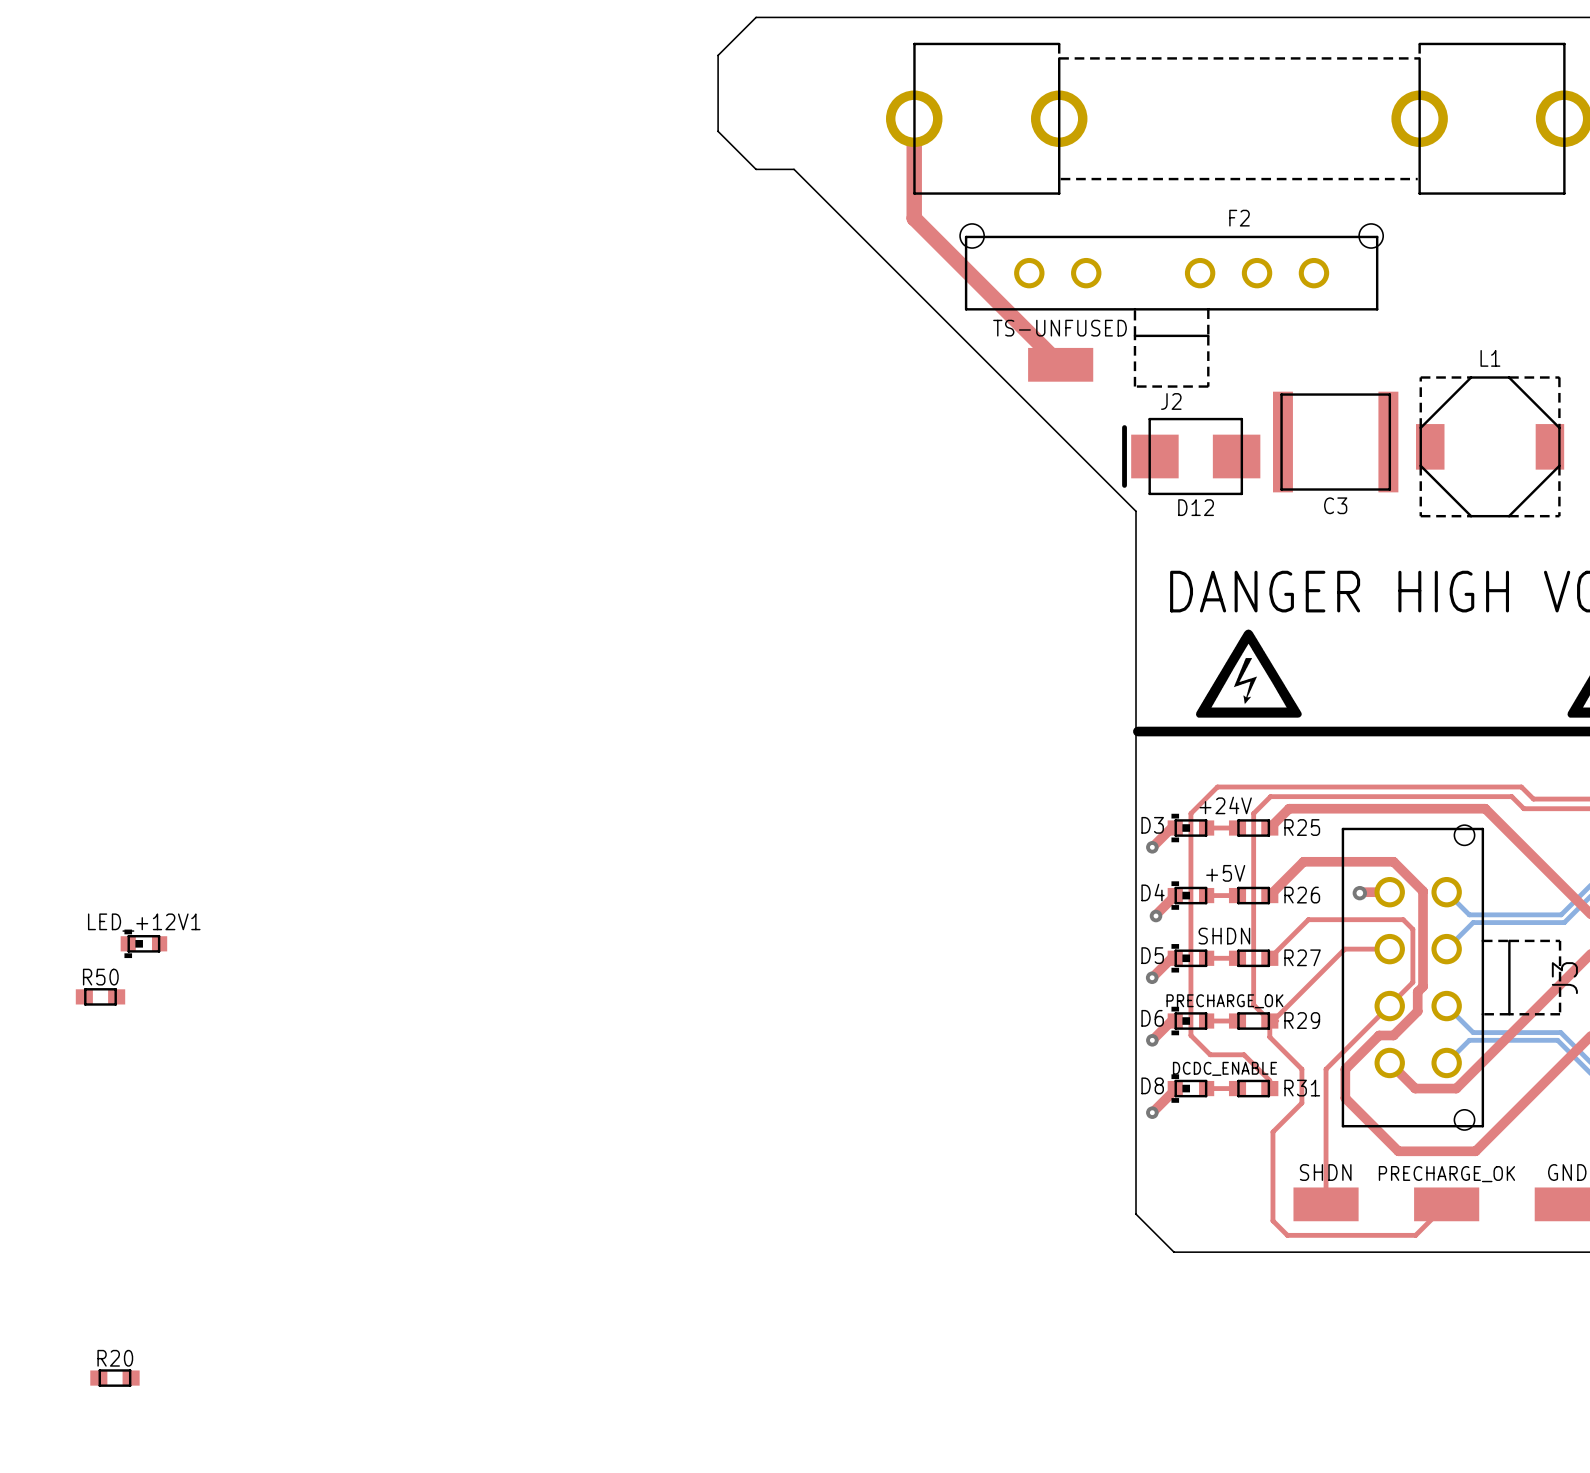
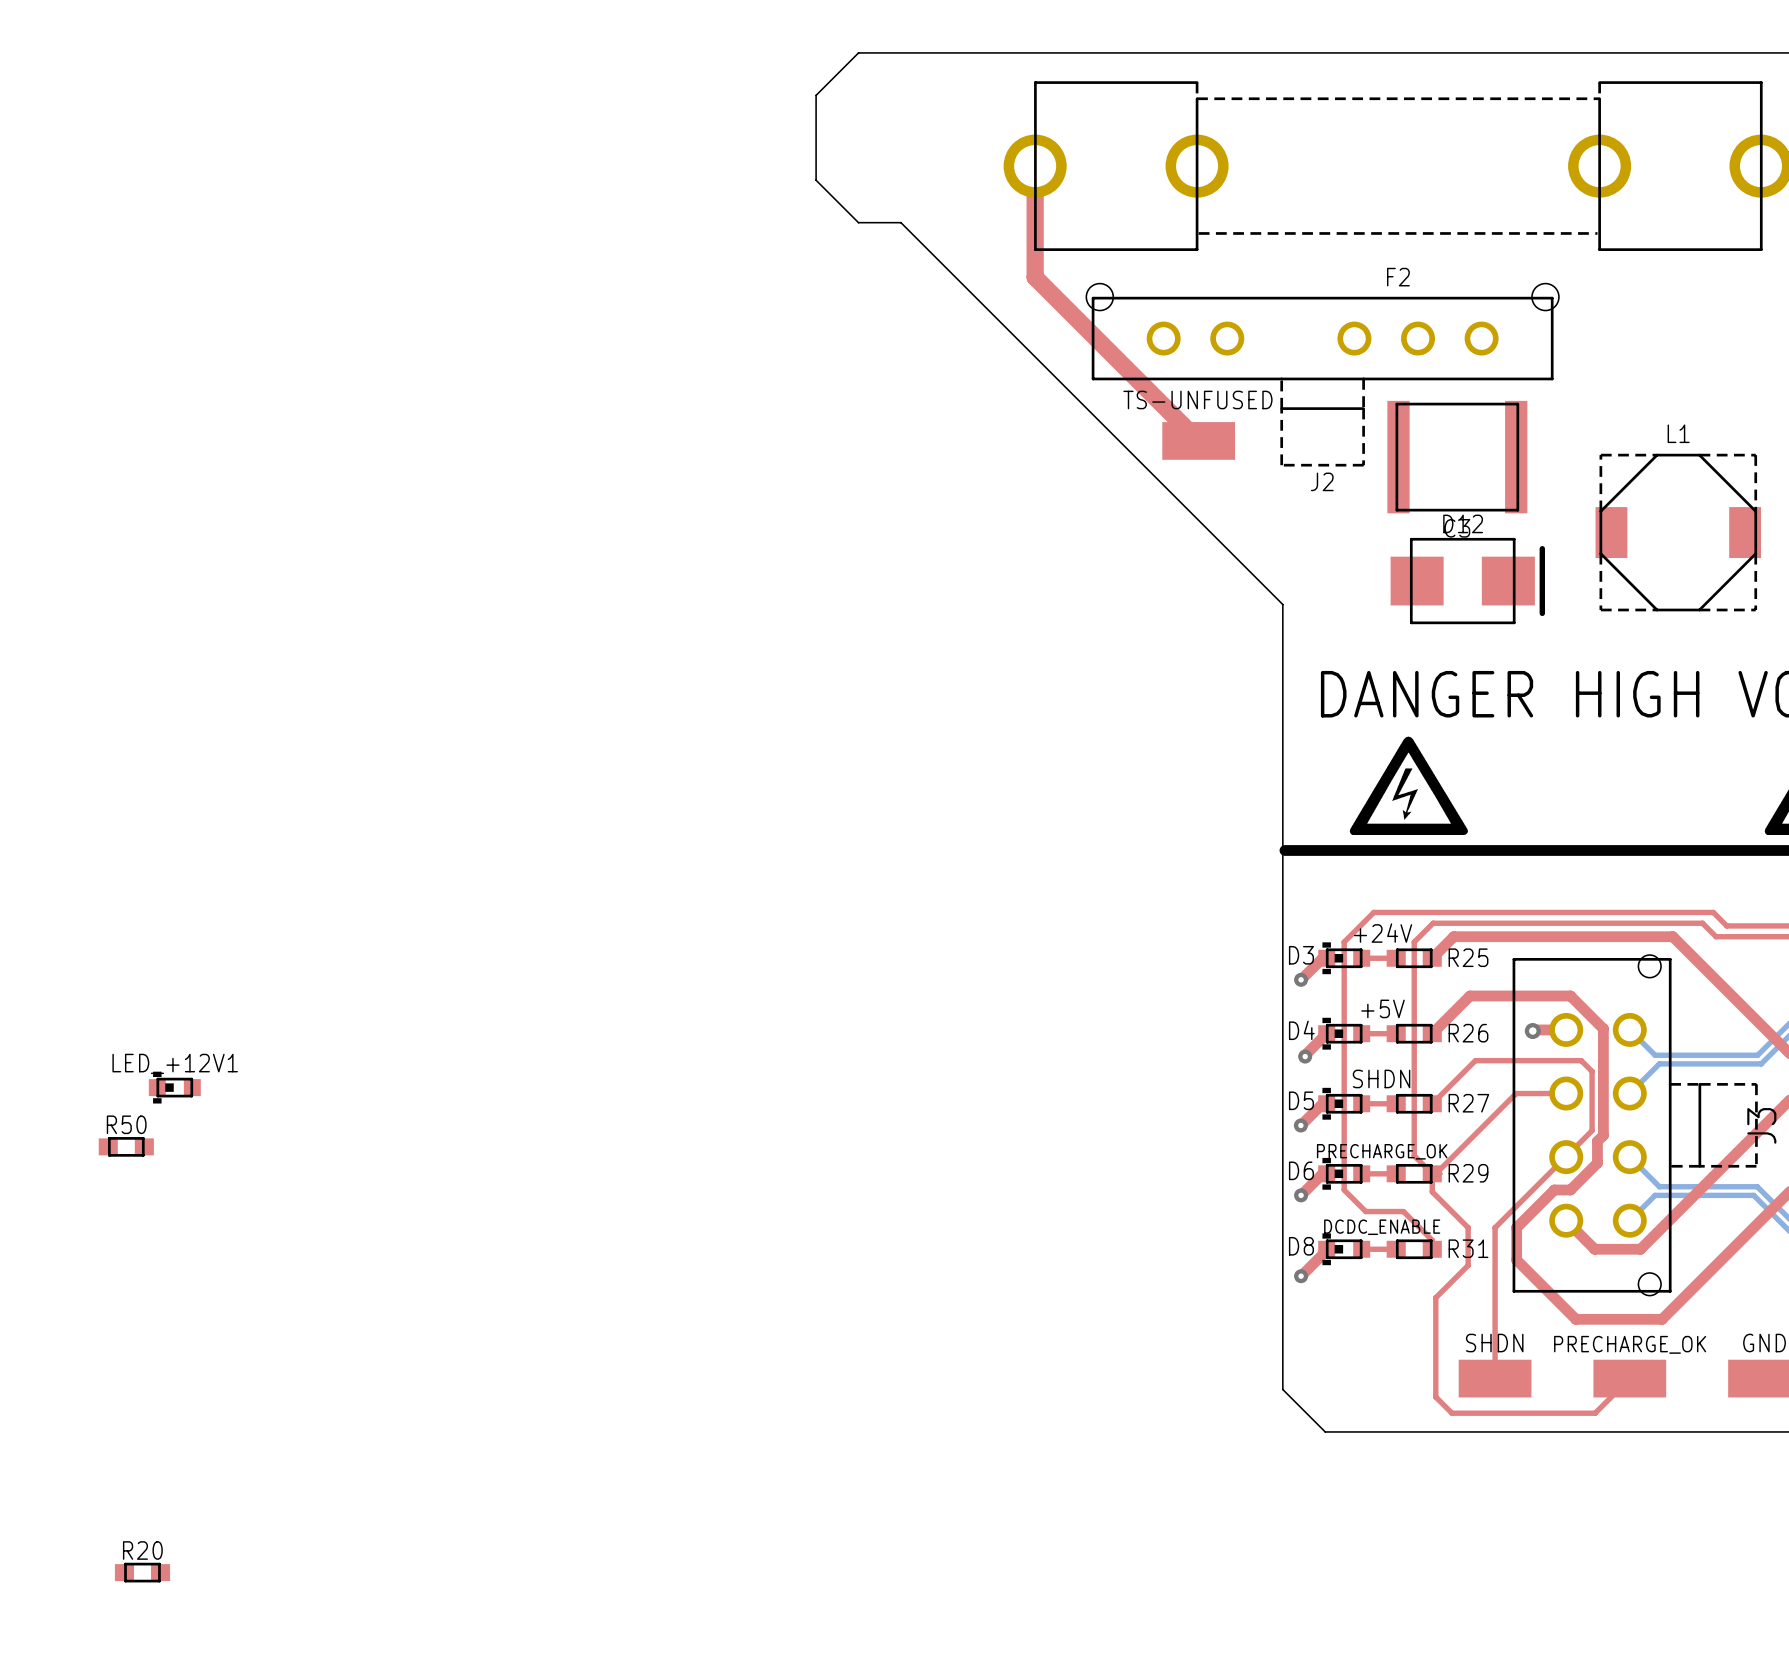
C3 position: (1335, 442) -> (1457, 457)
D12 rotation: 0° (1191, 456) -> 180° (1467, 581)
D12 position: (1191, 456) -> (1467, 581)

